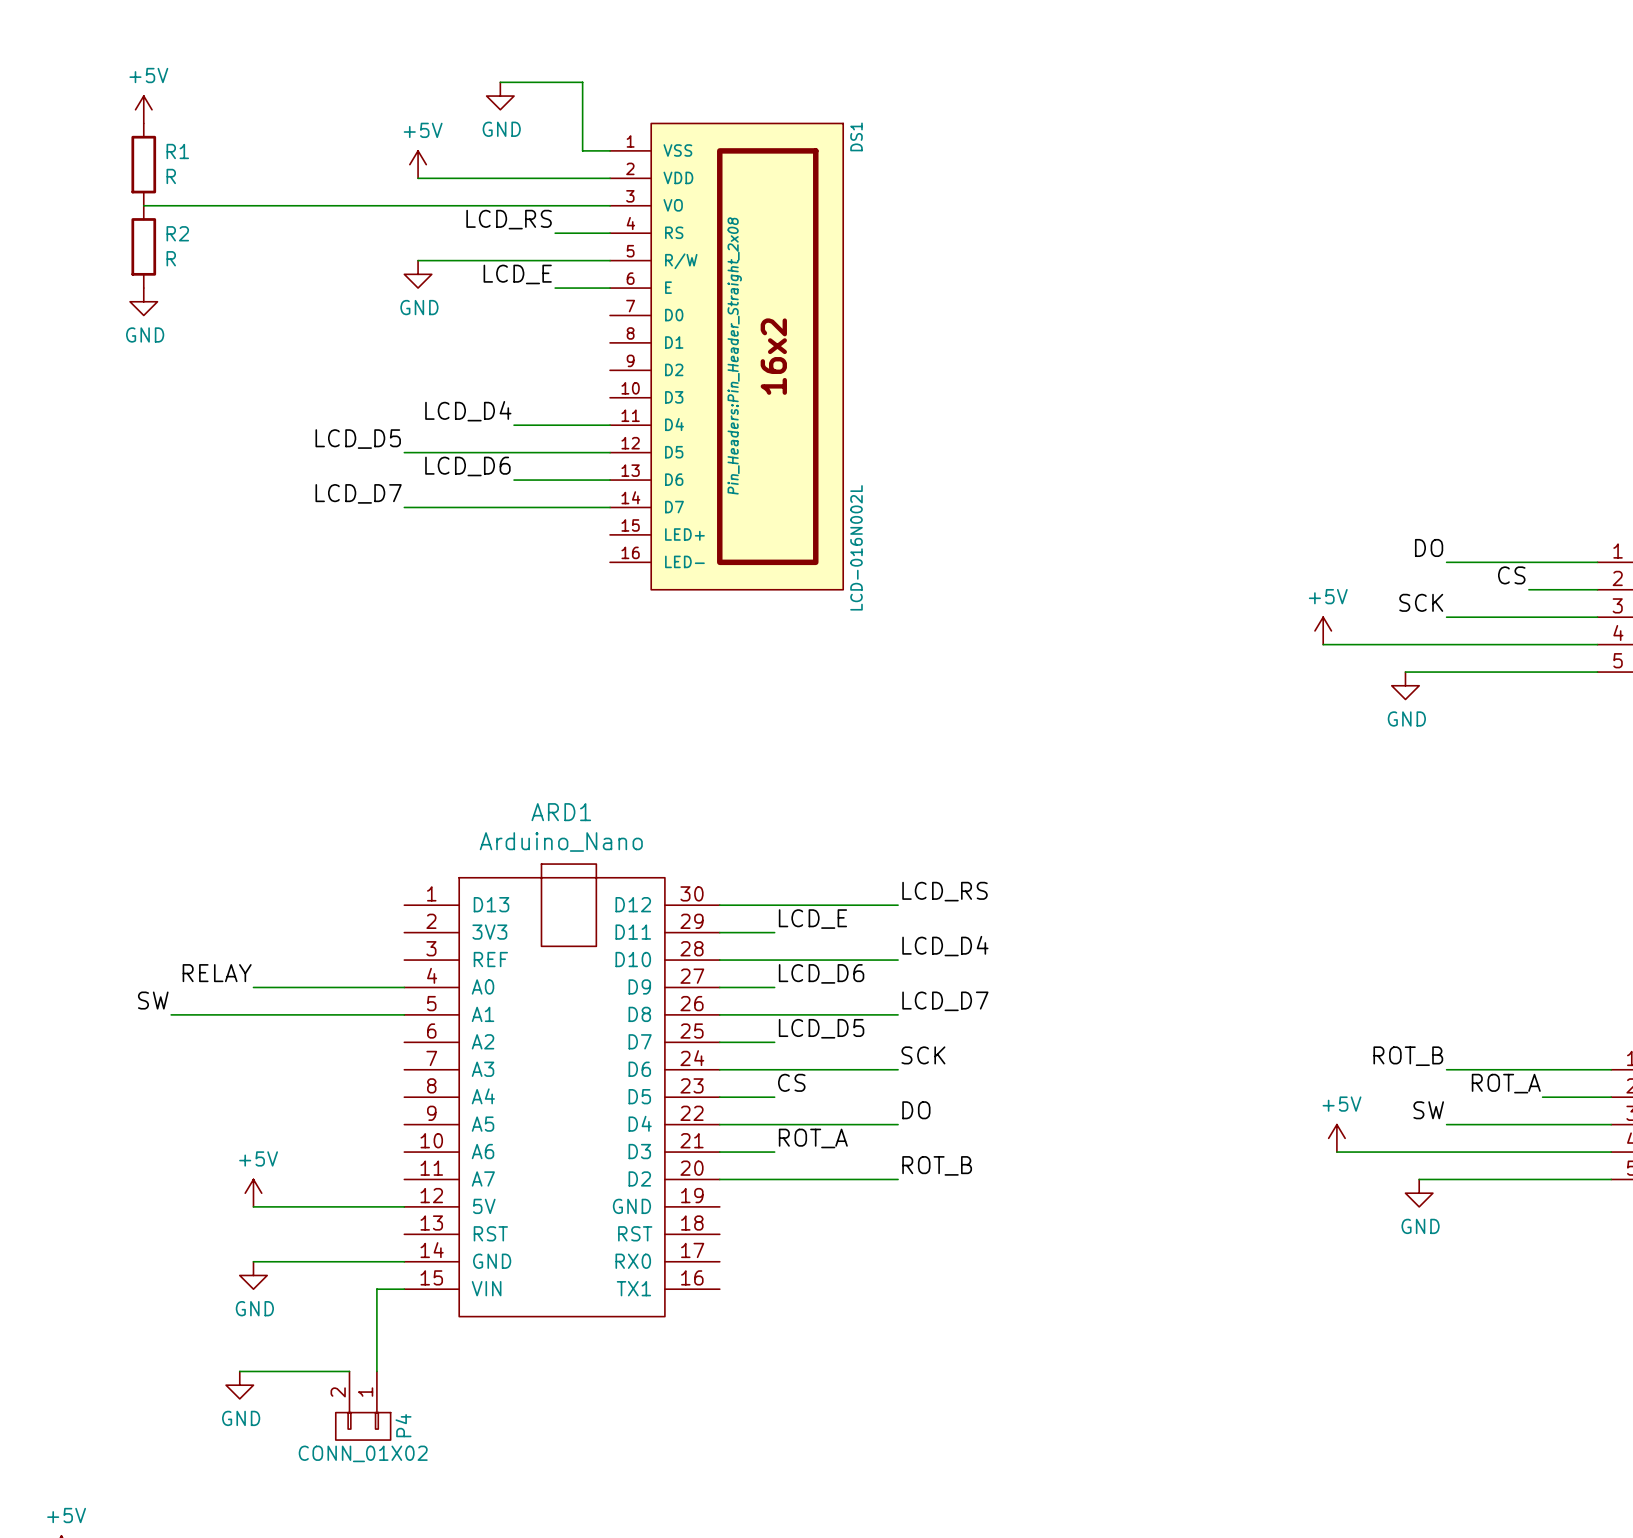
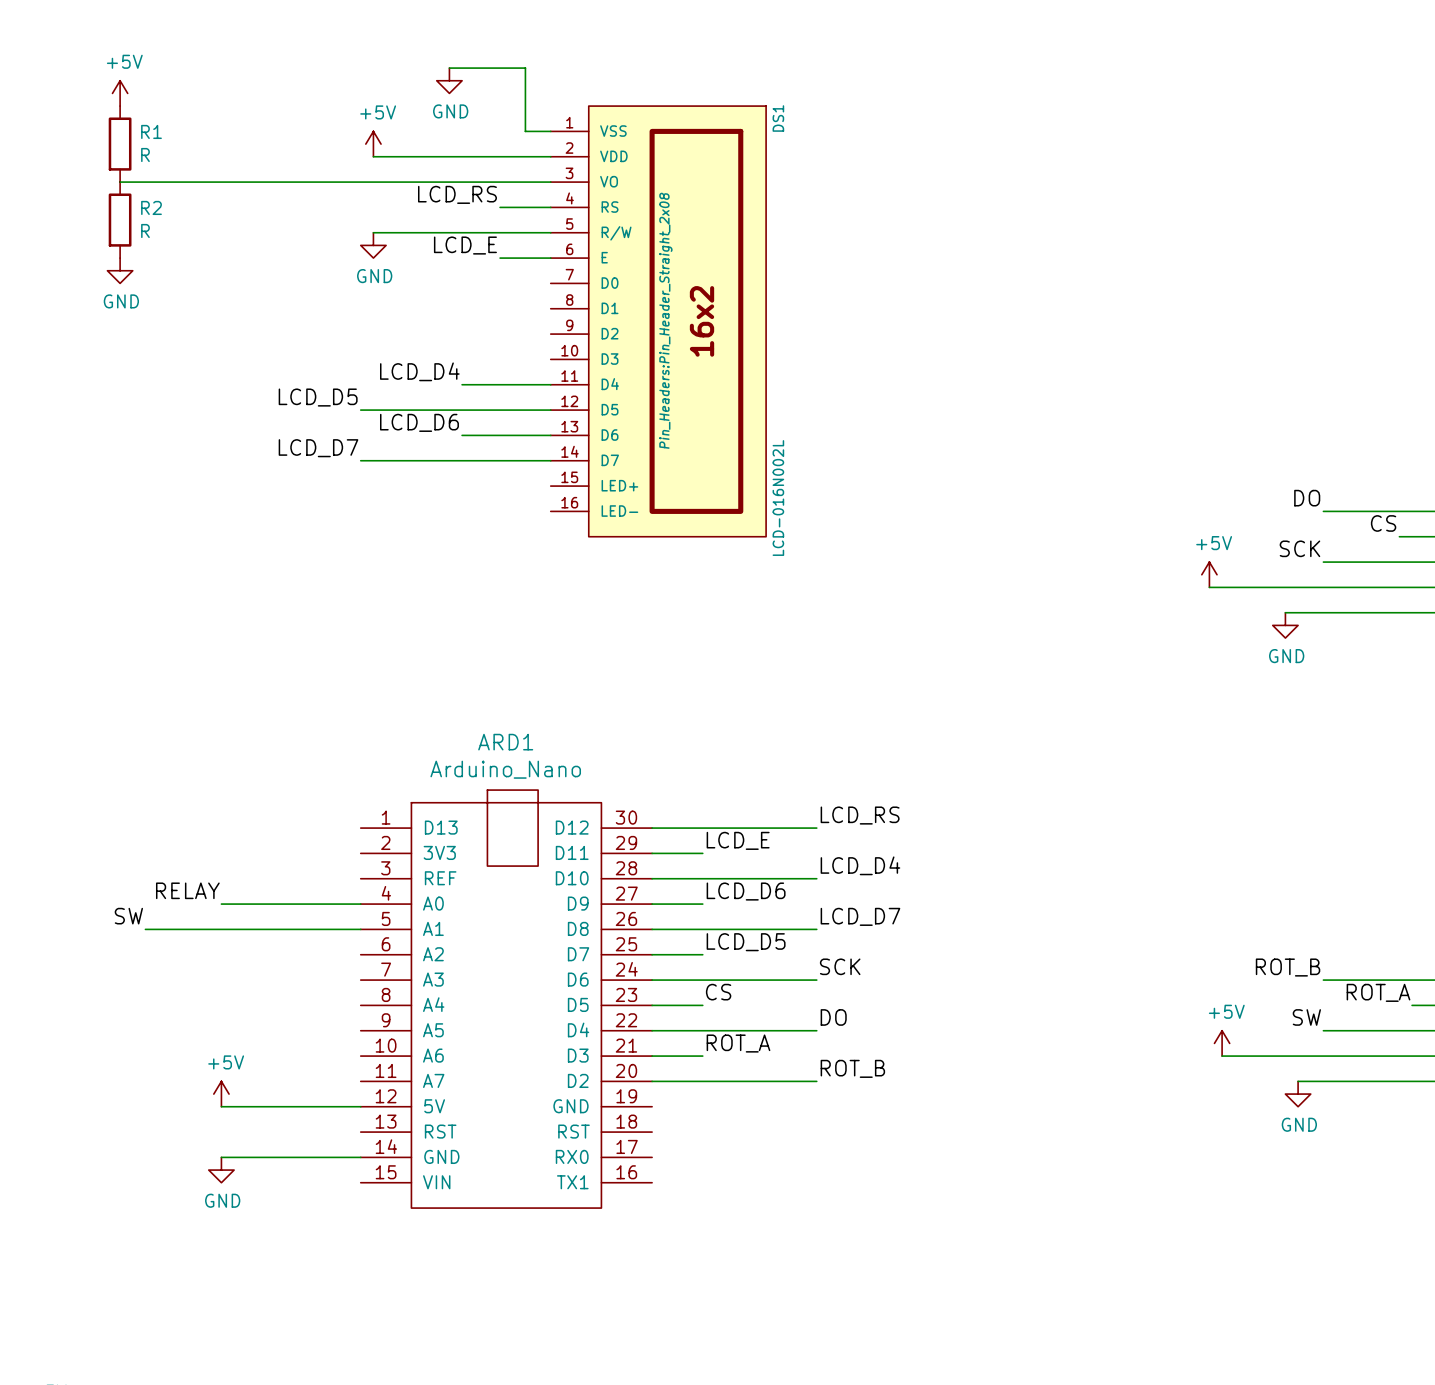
wire: (404, 1289) (376, 1289) (376, 1371) -> none
wire: (239, 1371) (349, 1371) -> none
power symbol: GND (239, 1385) -> none
P4: CONN_01X02 (363, 1405) -> none

